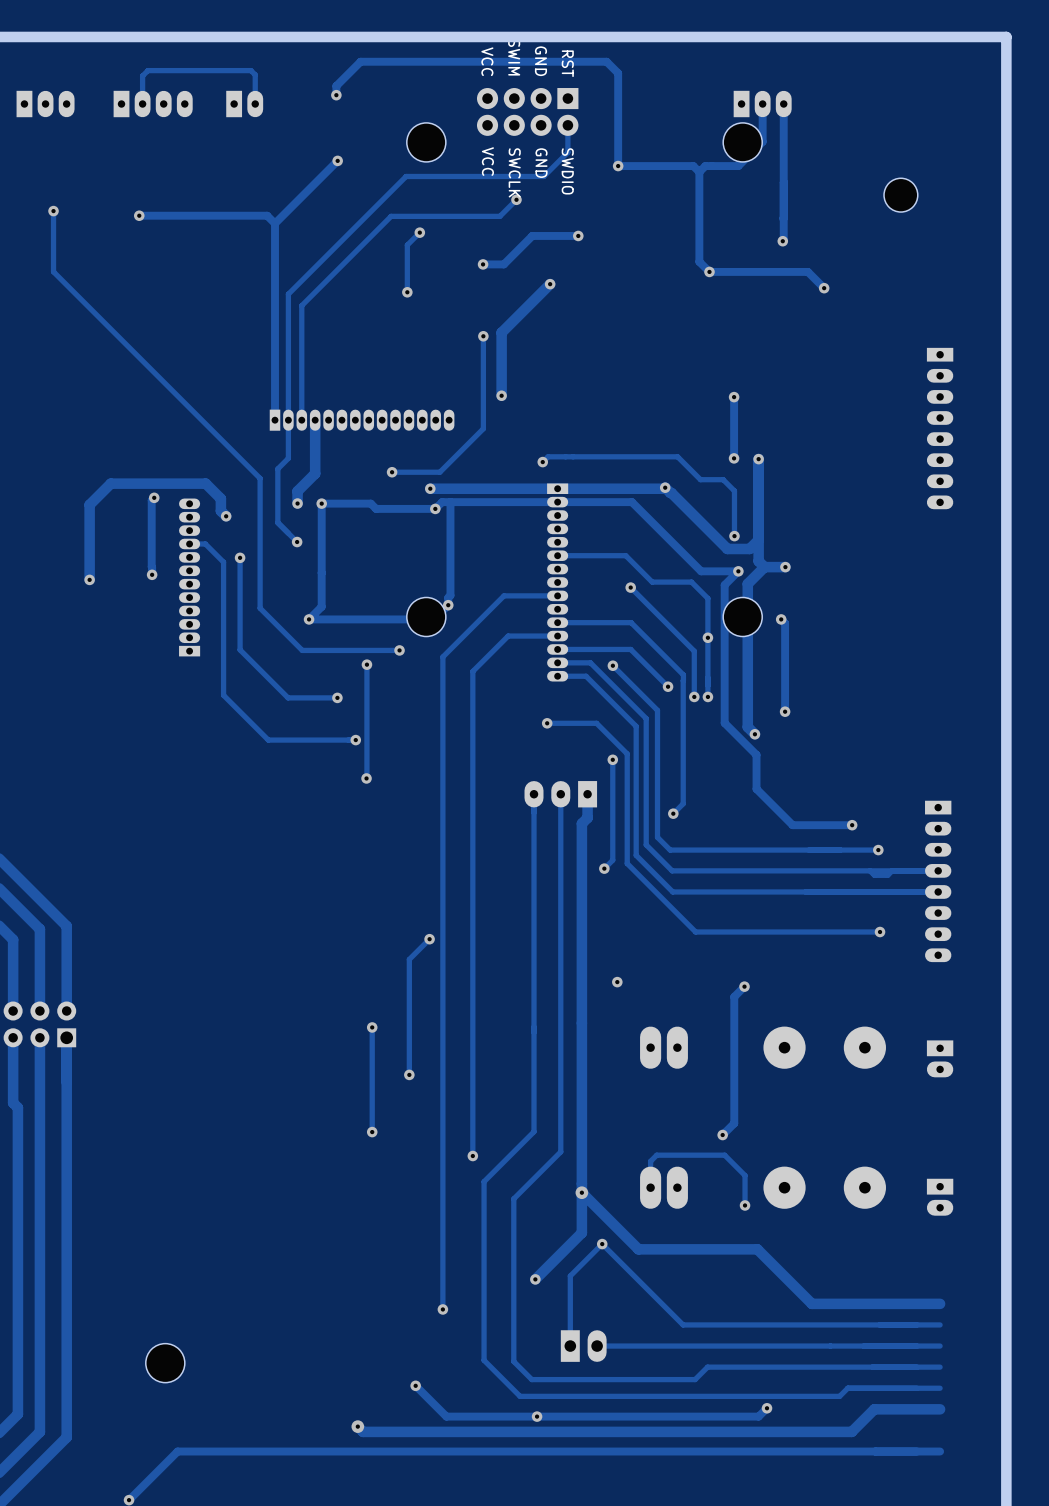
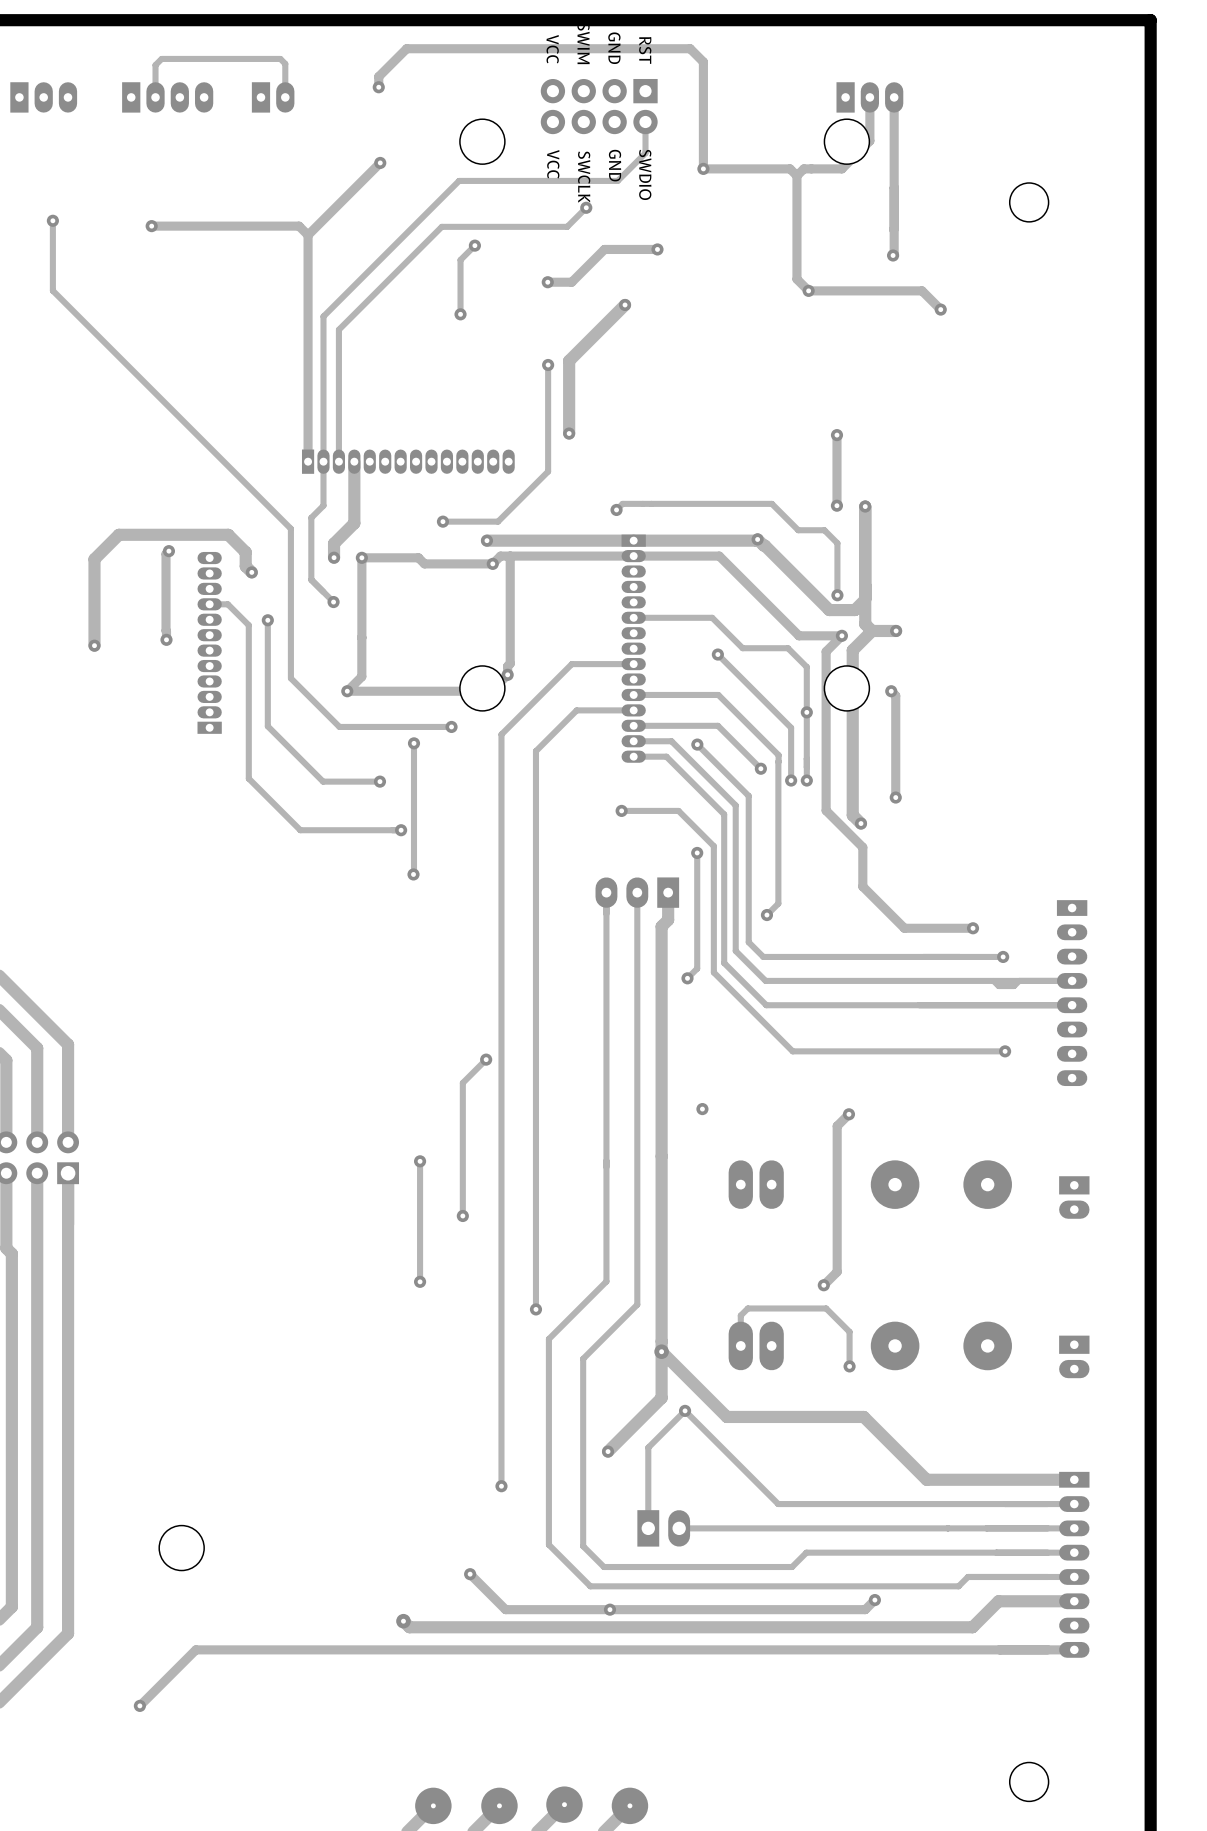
part: (940, 428) -> none
part: none -> (1074, 1564)

